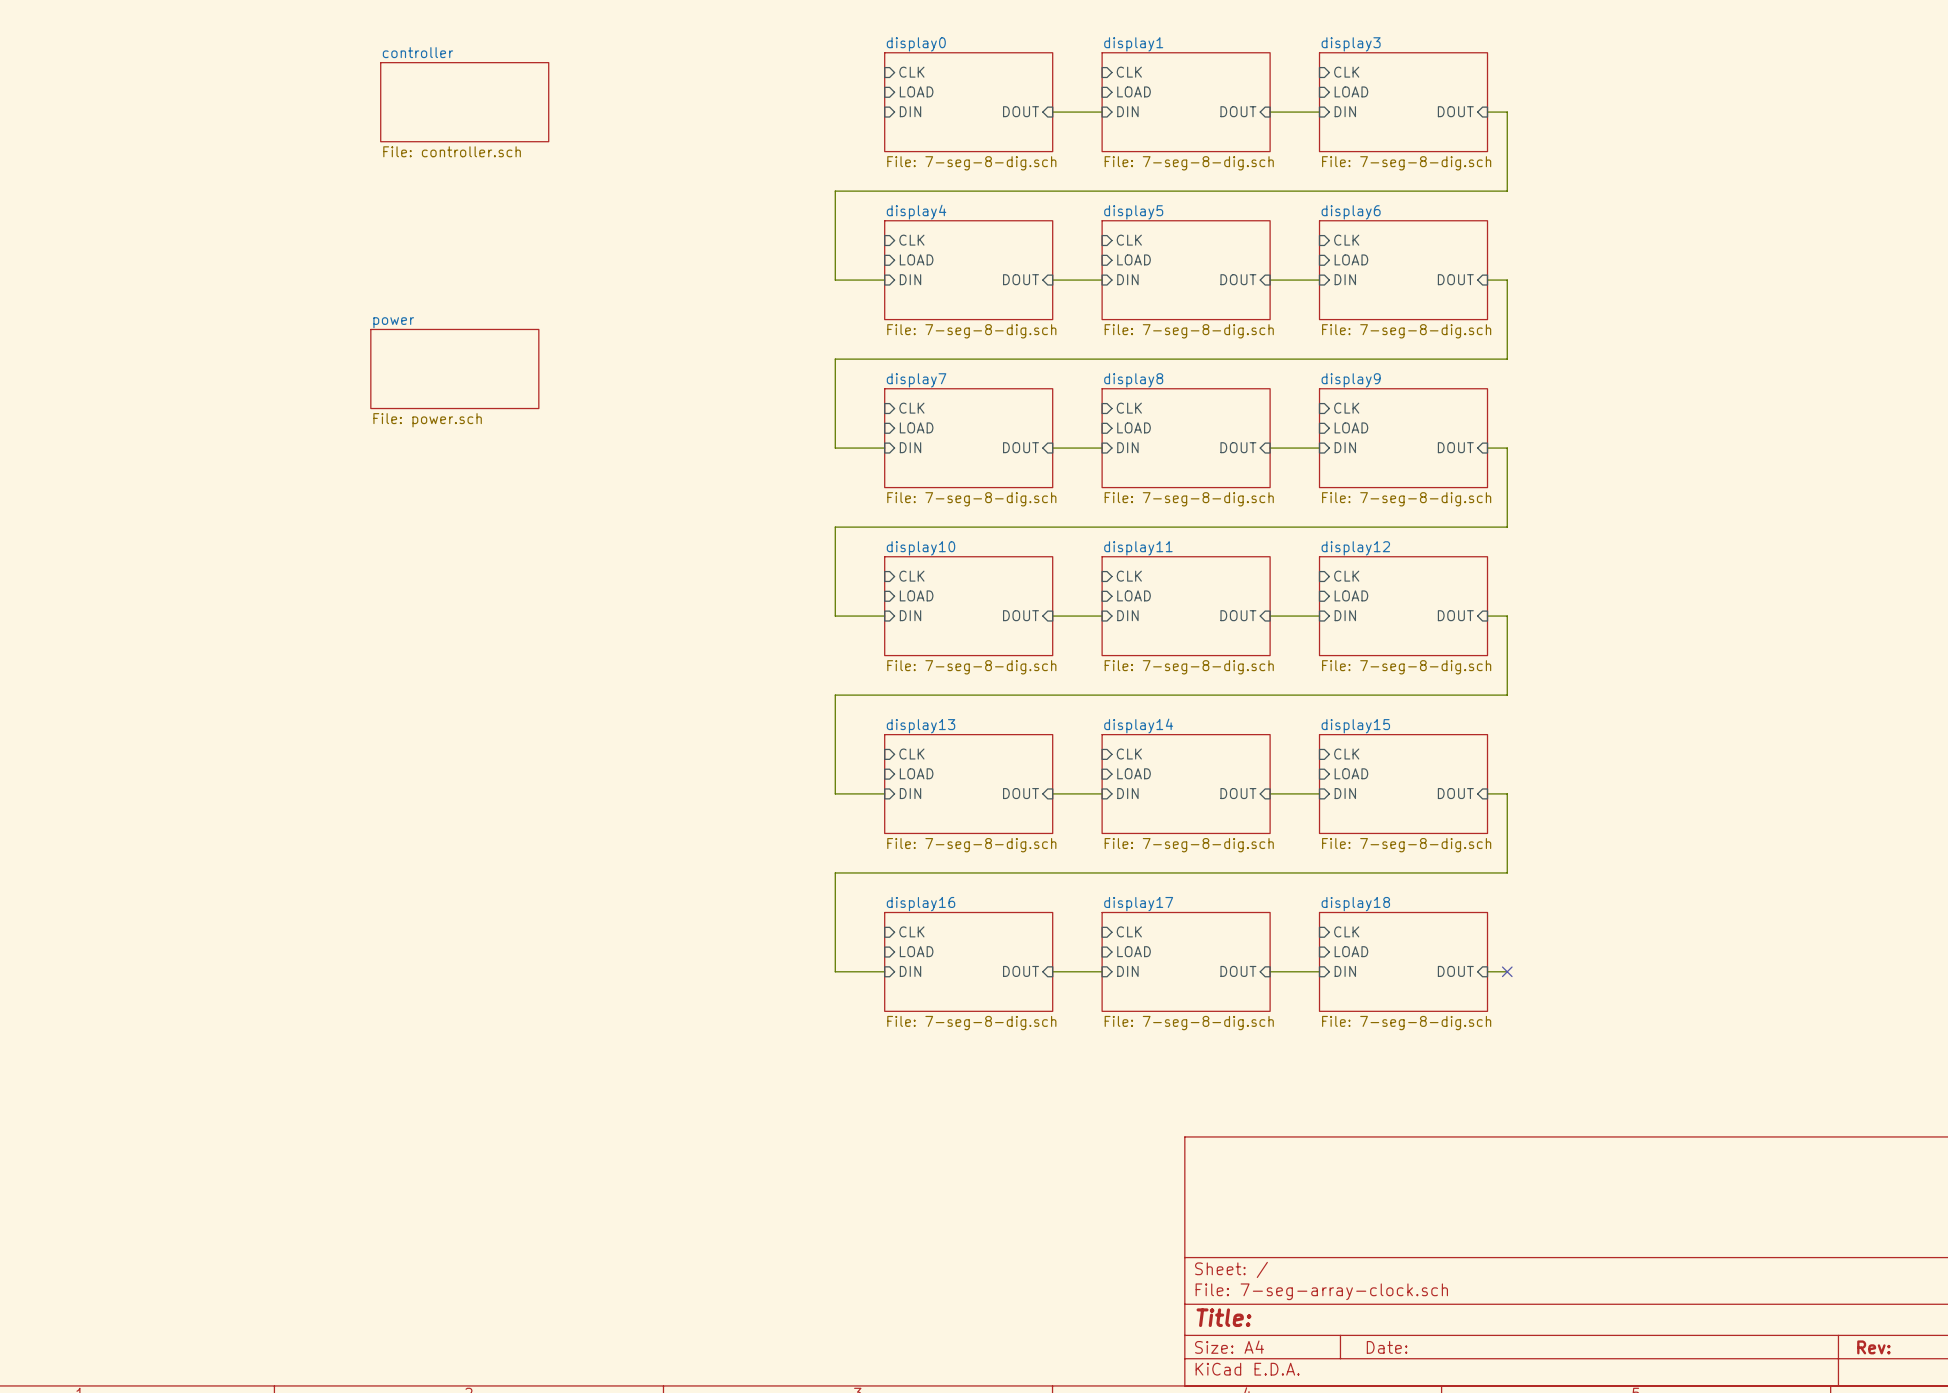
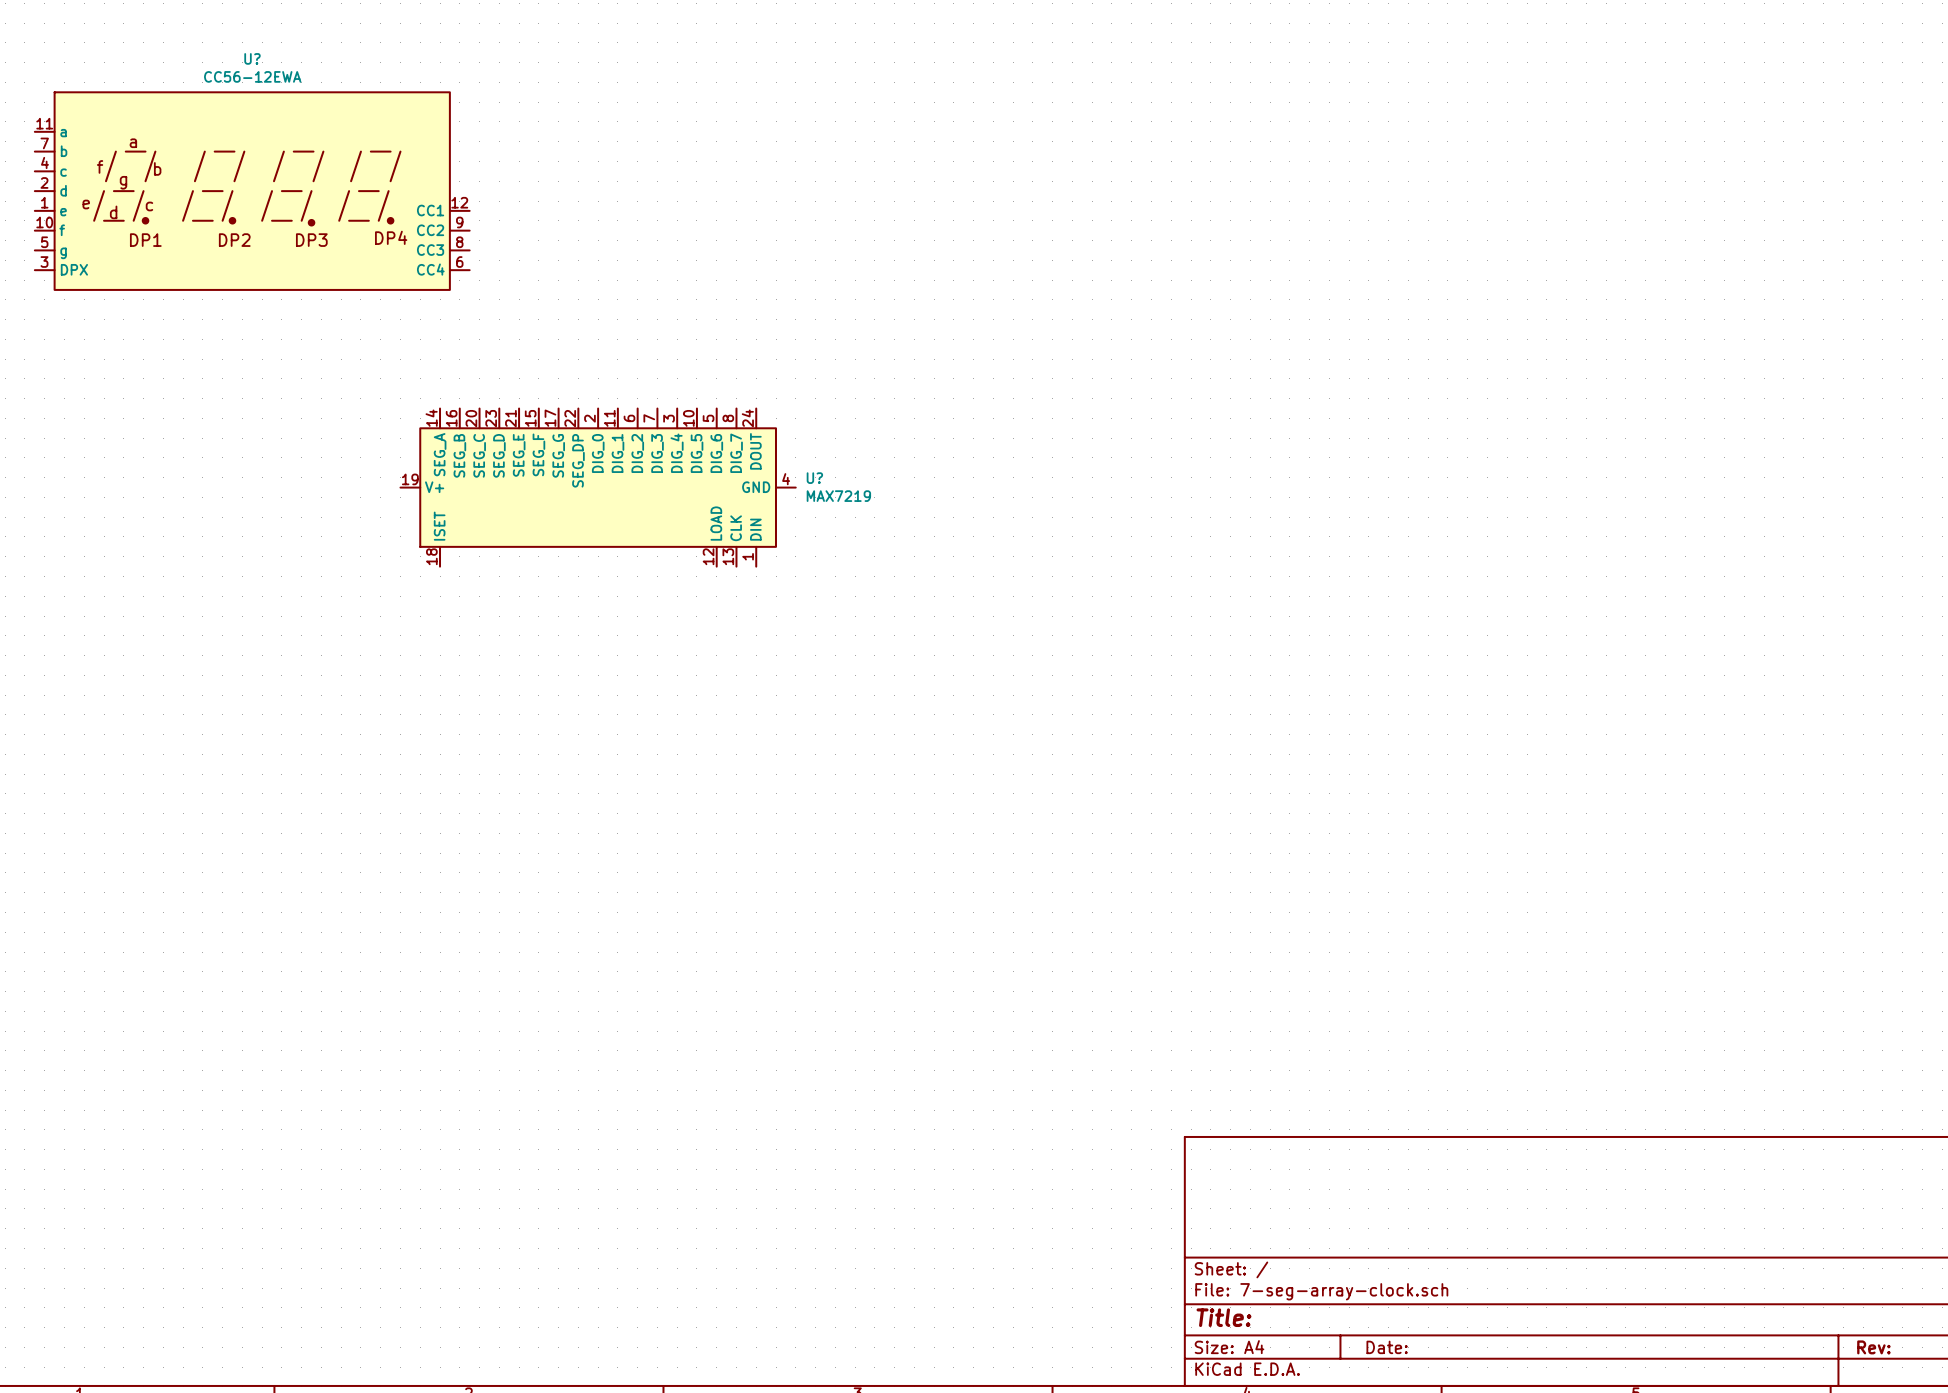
sheet pin: CLK (911, 72) -> none
sheet pin: CLK (1129, 72) -> none
sheet pin: CLK (1346, 72) -> none
sheet pin: LOAD (916, 91) -> none
sheet pin: LOAD (1134, 91) -> none
sheet pin: LOAD (1351, 91) -> none
sheet controller: File: controller.sch (464, 102) -> none
sheet display0: File: 7-seg-8-dig.sch (968, 102) -> none
sheet display1: File: 7-seg-8-dig.sch (1186, 102) -> none
sheet display3: File: 7-seg-8-dig.sch (1403, 102) -> none
sheet pin: DIN (910, 111) -> none
sheet pin: DOUT (1021, 111) -> none
sheet pin: DIN (1127, 111) -> none
sheet pin: DOUT (1238, 111) -> none
sheet pin: DIN (1345, 111) -> none
sheet pin: DOUT (1455, 111) -> none
wire: (1052, 112) (1102, 112) -> none
wire: (1270, 112) (1319, 112) -> none
wire: (1487, 112) (1507, 112) (1507, 191) (835, 191) (835, 280) (884, 280) -> none
U?: none -> CC56-12EWA (252, 191)
sheet pin: CLK (911, 240) -> none
sheet pin: CLK (1129, 240) -> none
sheet pin: CLK (1346, 240) -> none
sheet pin: LOAD (916, 259) -> none
sheet pin: LOAD (1134, 259) -> none
sheet pin: LOAD (1351, 259) -> none
sheet display4: File: 7-seg-8-dig.sch (968, 270) -> none
sheet display5: File: 7-seg-8-dig.sch (1186, 270) -> none
sheet display6: File: 7-seg-8-dig.sch (1403, 270) -> none
sheet pin: DIN (910, 279) -> none
sheet pin: DOUT (1021, 279) -> none
sheet pin: DIN (1127, 279) -> none
sheet pin: DOUT (1238, 279) -> none
sheet pin: DIN (1345, 279) -> none
sheet pin: DOUT (1455, 279) -> none
wire: (1052, 280) (1102, 280) -> none
wire: (1270, 280) (1319, 280) -> none
wire: (1487, 280) (1507, 280) (1507, 359) (835, 359) (835, 448) (884, 448) -> none
sheet power: File: power.sch (454, 368) -> none
sheet pin: CLK (911, 408) -> none
sheet pin: CLK (1129, 408) -> none
sheet pin: CLK (1346, 408) -> none
sheet pin: LOAD (916, 427) -> none
sheet pin: LOAD (1134, 427) -> none
sheet pin: LOAD (1351, 427) -> none
sheet display7: File: 7-seg-8-dig.sch (968, 438) -> none
sheet display8: File: 7-seg-8-dig.sch (1186, 438) -> none
sheet display9: File: 7-seg-8-dig.sch (1403, 438) -> none
sheet pin: DIN (910, 447) -> none
sheet pin: DOUT (1021, 447) -> none
sheet pin: DIN (1127, 447) -> none
sheet pin: DOUT (1238, 447) -> none
sheet pin: DIN (1345, 447) -> none
sheet pin: DOUT (1455, 447) -> none
wire: (1052, 448) (1102, 448) -> none
wire: (1270, 448) (1319, 448) -> none
wire: (1487, 448) (1507, 448) (1507, 527) (835, 527) (835, 616) (884, 616) -> none
U?: none -> MAX7219 (598, 487)
sheet pin: CLK (911, 576) -> none
sheet pin: CLK (1129, 576) -> none
sheet pin: CLK (1346, 576) -> none
sheet pin: LOAD (916, 595) -> none
sheet pin: LOAD (1134, 595) -> none
sheet pin: LOAD (1351, 595) -> none
sheet display10: File: 7-seg-8-dig.sch (968, 606) -> none
sheet display11: File: 7-seg-8-dig.sch (1186, 606) -> none
sheet display12: File: 7-seg-8-dig.sch (1403, 606) -> none
sheet pin: DIN (910, 615) -> none
sheet pin: DOUT (1021, 615) -> none
sheet pin: DIN (1127, 615) -> none
sheet pin: DOUT (1238, 615) -> none
sheet pin: DIN (1345, 615) -> none
sheet pin: DOUT (1455, 615) -> none
wire: (1052, 616) (1102, 616) -> none
wire: (1270, 616) (1319, 616) -> none
wire: (1487, 616) (1507, 616) (1507, 695) (835, 695) (835, 793) (884, 793) -> none
sheet pin: CLK (911, 754) -> none
sheet pin: CLK (1129, 754) -> none
sheet pin: CLK (1346, 754) -> none
sheet pin: LOAD (916, 773) -> none
sheet pin: LOAD (1134, 773) -> none
sheet pin: LOAD (1351, 773) -> none
sheet display13: File: 7-seg-8-dig.sch (968, 784) -> none
sheet display14: File: 7-seg-8-dig.sch (1186, 784) -> none
sheet display15: File: 7-seg-8-dig.sch (1403, 784) -> none
sheet pin: DIN (910, 793) -> none
sheet pin: DOUT (1021, 793) -> none
wire: (1052, 793) (1102, 793) -> none
sheet pin: DIN (1127, 793) -> none
sheet pin: DOUT (1238, 793) -> none
wire: (1270, 793) (1319, 793) -> none
sheet pin: DIN (1345, 793) -> none
sheet pin: DOUT (1455, 793) -> none
wire: (1487, 793) (1507, 793) (1507, 872) (835, 872) (835, 971) (884, 971) -> none
sheet pin: CLK (911, 931) -> none
sheet pin: CLK (1129, 931) -> none
sheet pin: CLK (1346, 931) -> none
sheet pin: LOAD (916, 951) -> none
sheet pin: LOAD (1134, 951) -> none
sheet pin: LOAD (1351, 951) -> none
sheet display16: File: 7-seg-8-dig.sch (968, 961) -> none
sheet display17: File: 7-seg-8-dig.sch (1186, 961) -> none
sheet display18: File: 7-seg-8-dig.sch (1403, 961) -> none
sheet pin: DIN (910, 971) -> none
sheet pin: DOUT (1021, 971) -> none
wire: (1052, 971) (1102, 971) -> none
sheet pin: DIN (1127, 971) -> none
sheet pin: DOUT (1238, 971) -> none
wire: (1270, 971) (1319, 971) -> none
sheet pin: DIN (1345, 971) -> none
sheet pin: DOUT (1455, 971) -> none
wire: (1487, 971) (1507, 971) -> none
no-connect mark: (1507, 971) -> none

